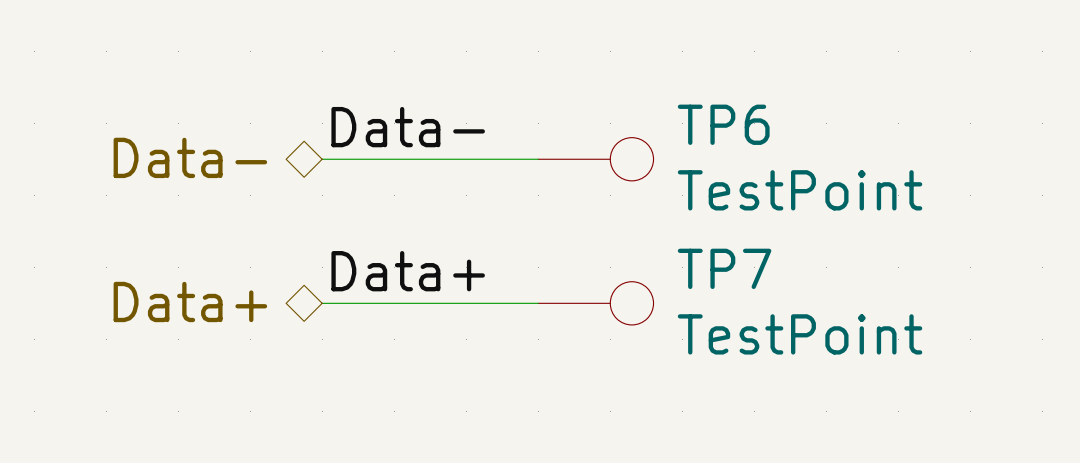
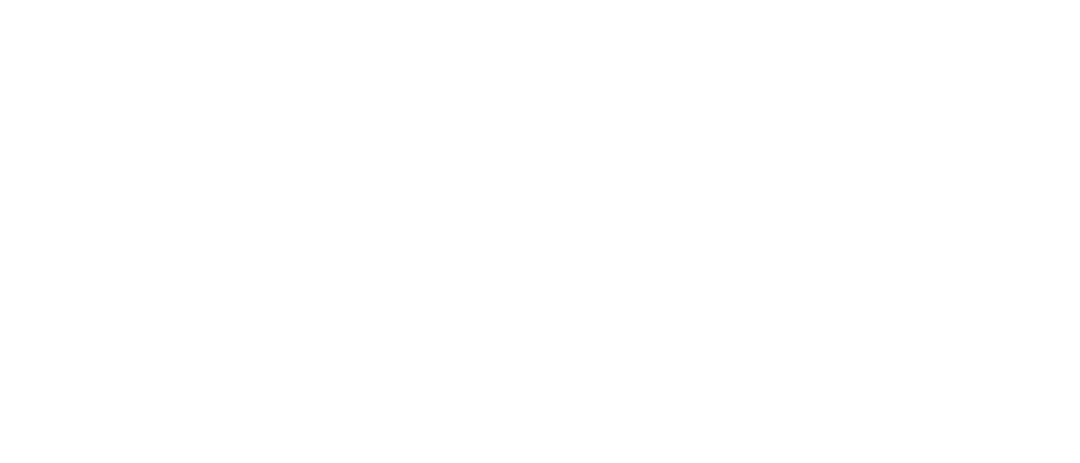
label: Data- (408, 127) -> none
hierarchical label: Data- (190, 157) -> none
wire: (322, 159) (538, 159) -> none
TP6: TestPoint (595, 159) -> none
label: Data+ (408, 271) -> none
hierarchical label: Data+ (190, 301) -> none
wire: (322, 303) (538, 303) -> none
TP7: TestPoint (595, 303) -> none

